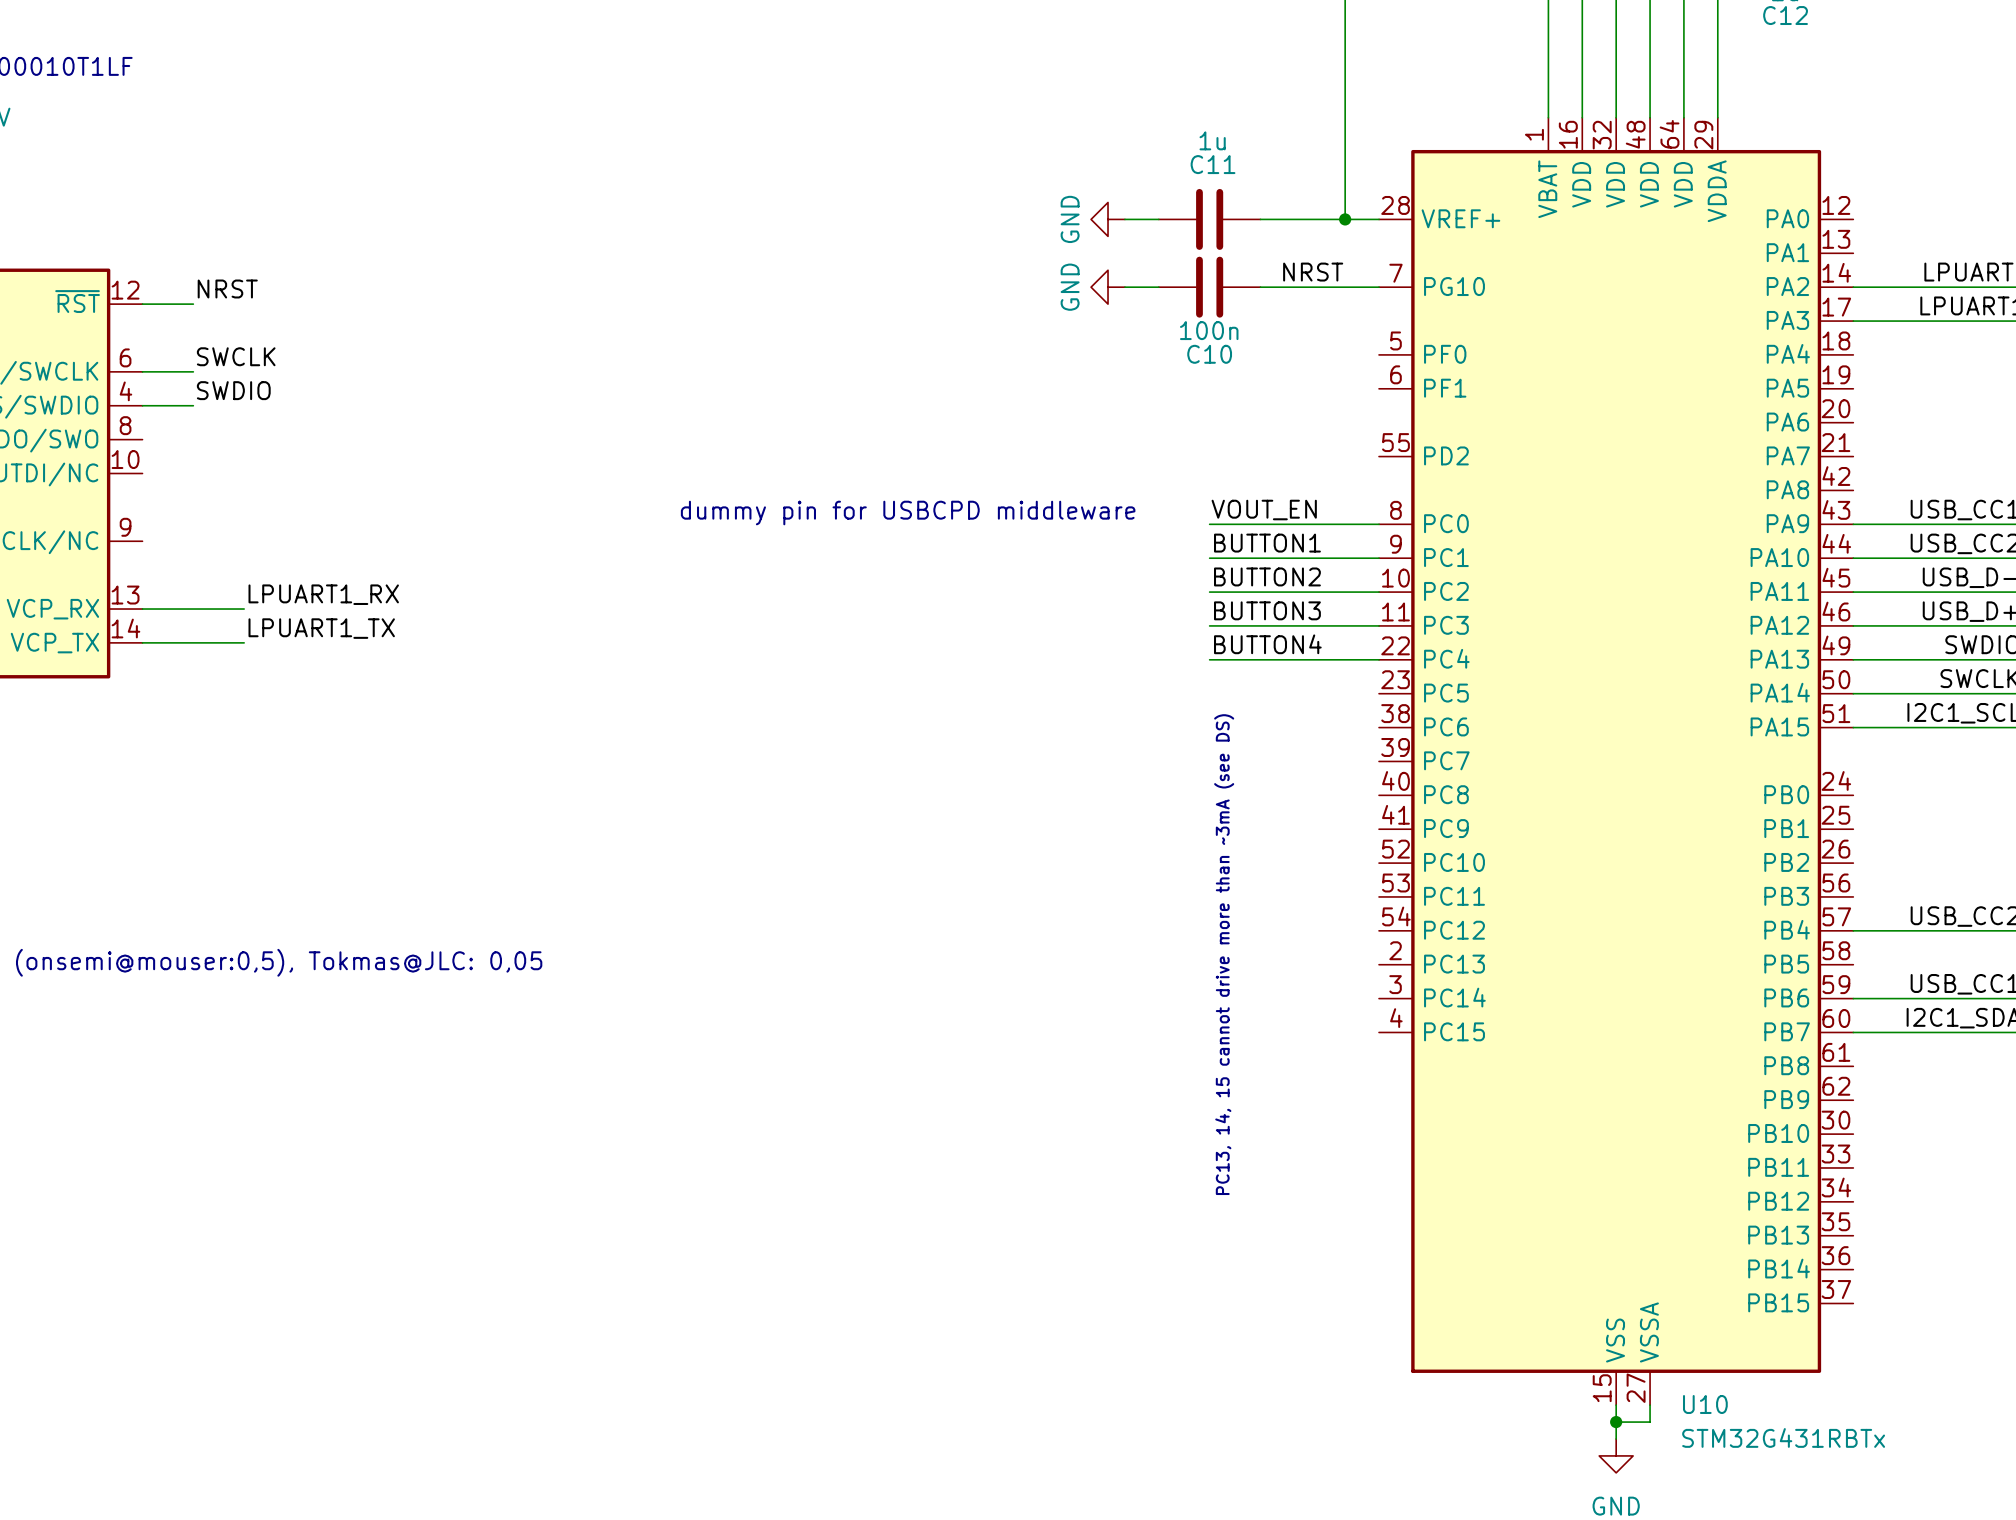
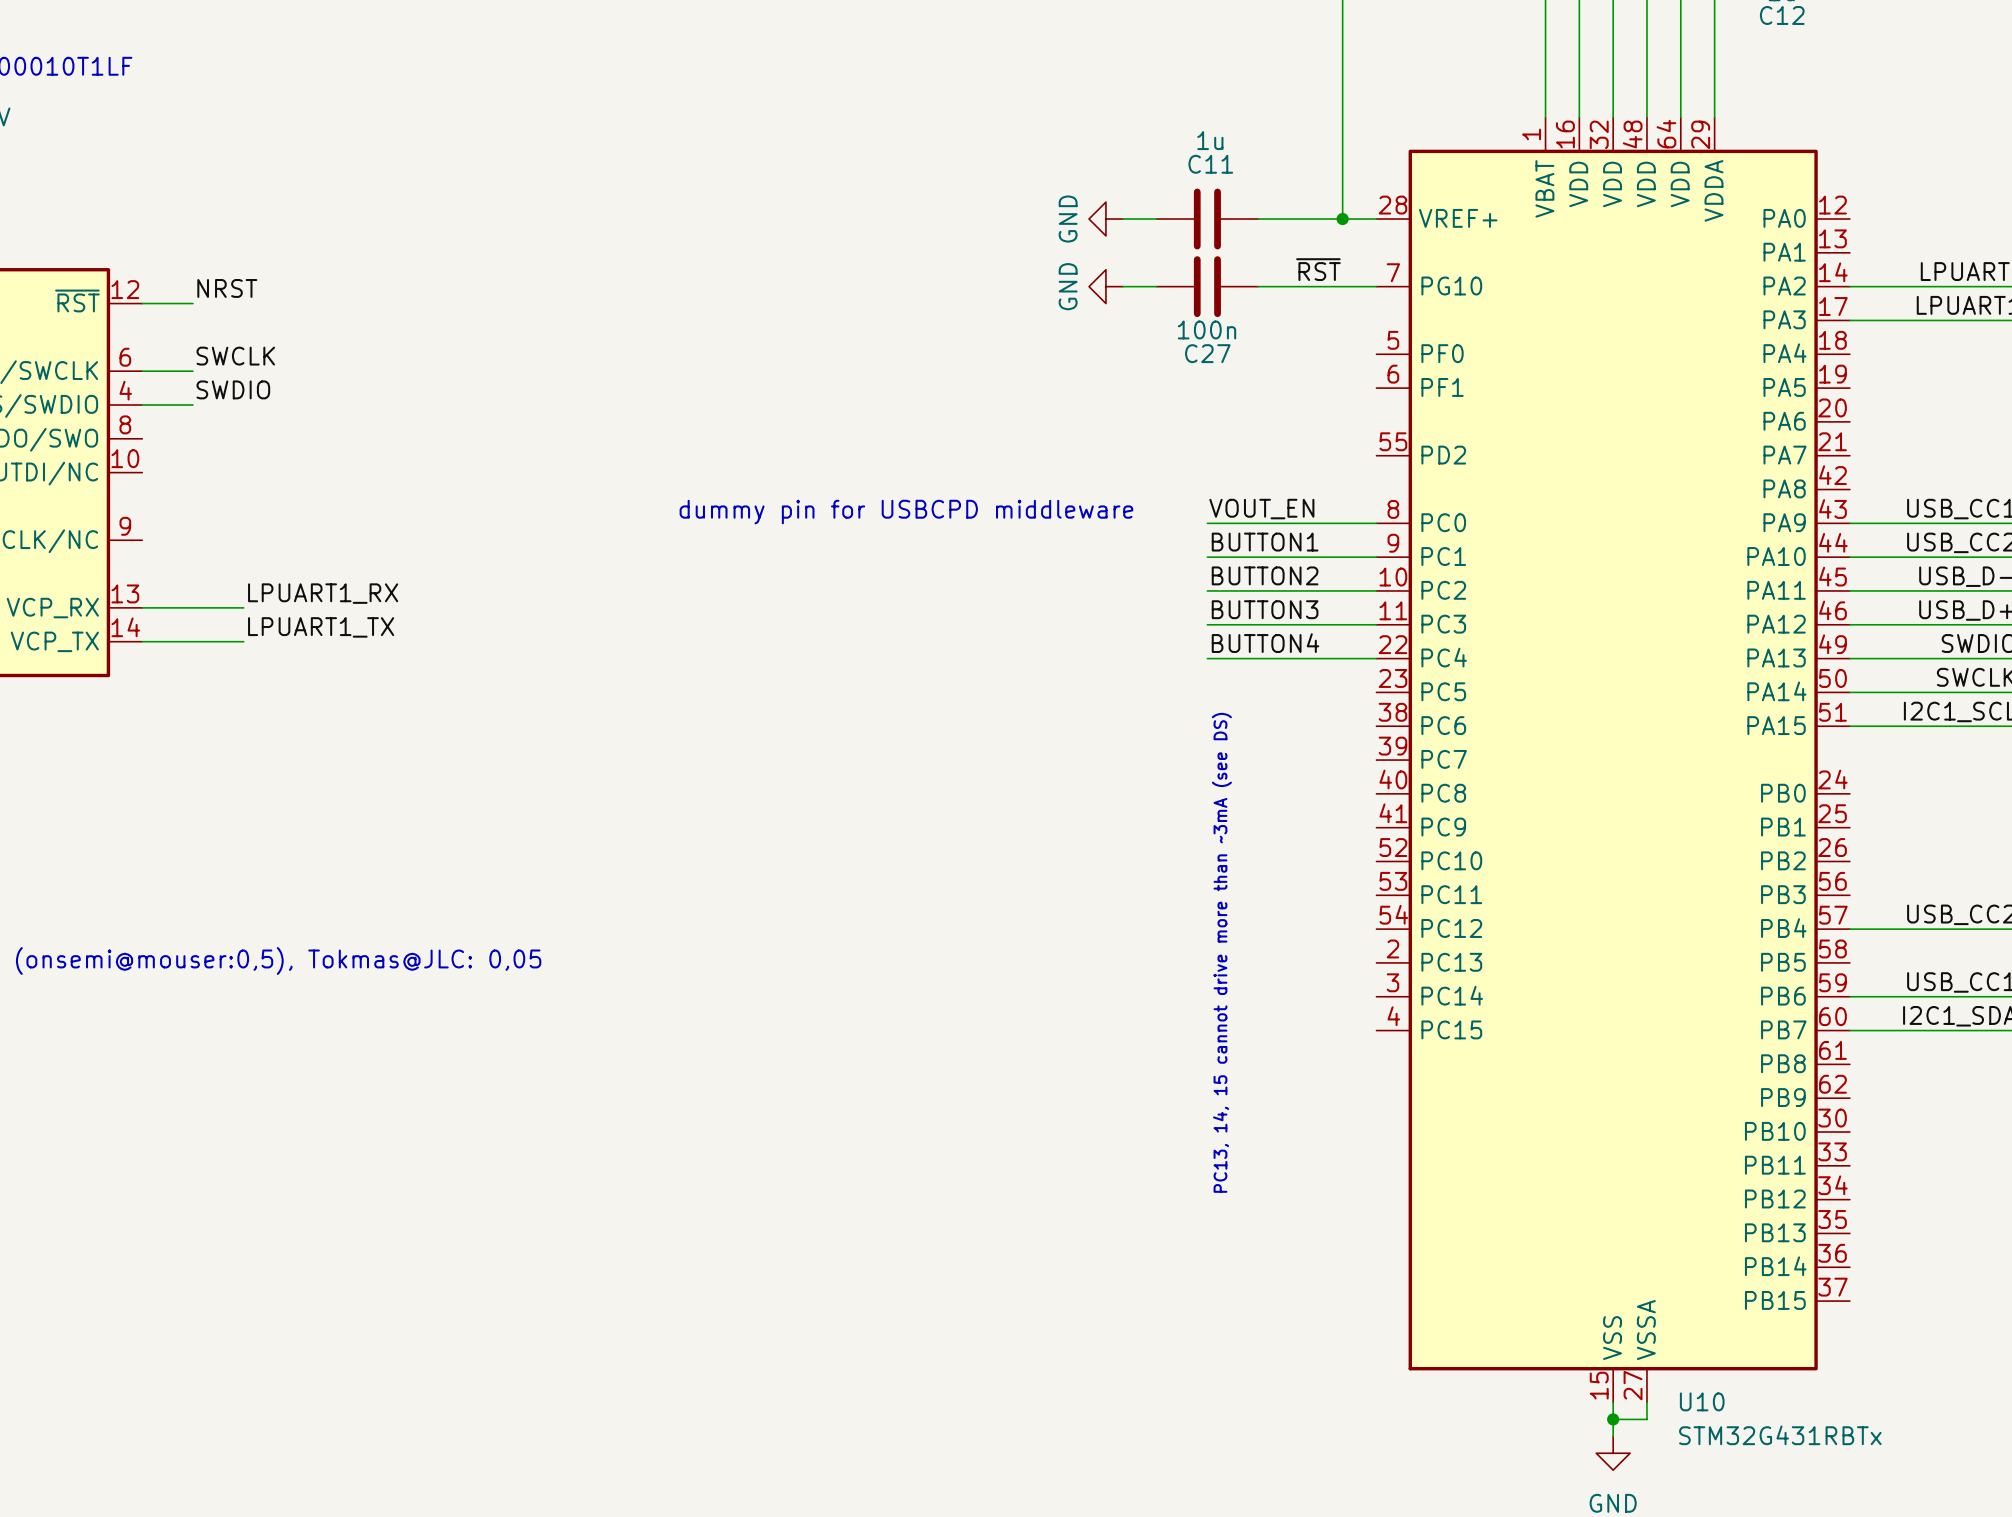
label: NRST (1313, 272) -> ~{RST} (1318, 269)
C10 name: C10 (1209, 354) -> C27 (1207, 353)

